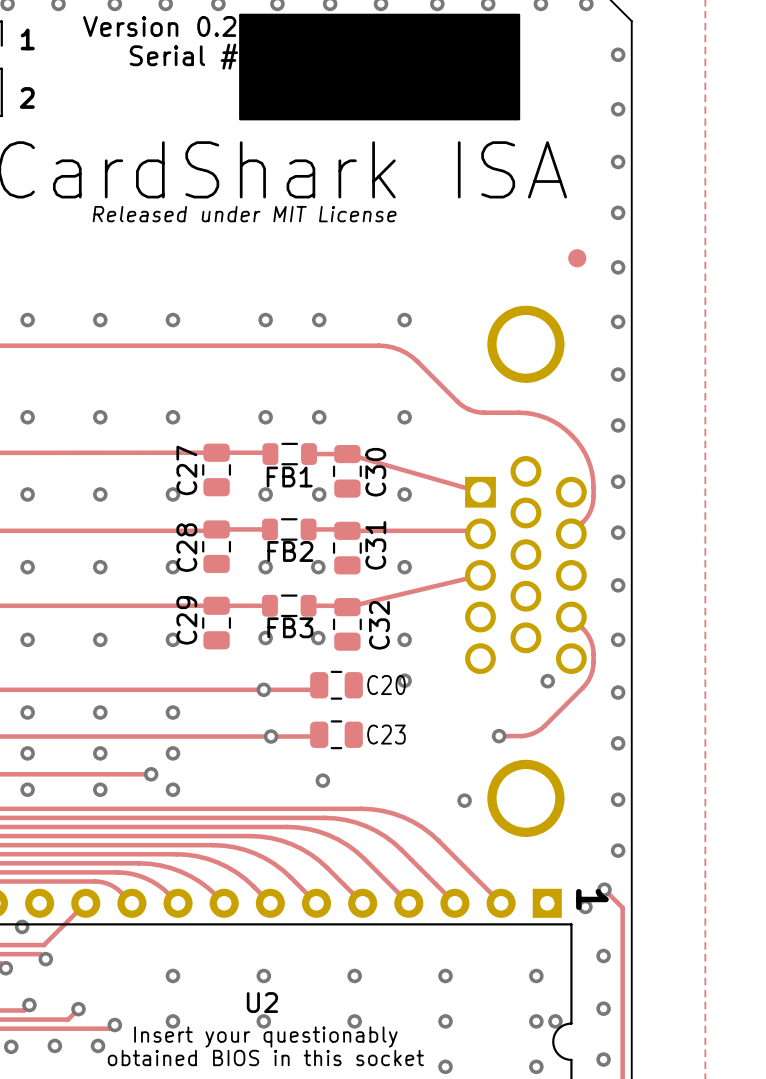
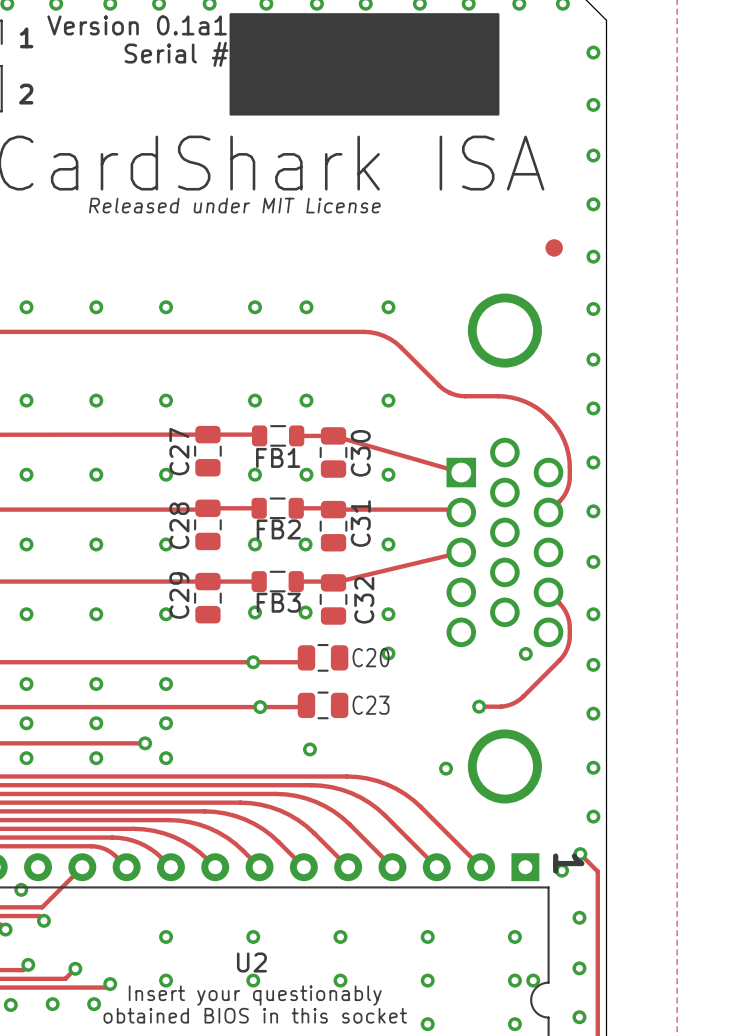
text: Version 0.2 (159, 26) -> Version 0.1a1 (137, 25)

